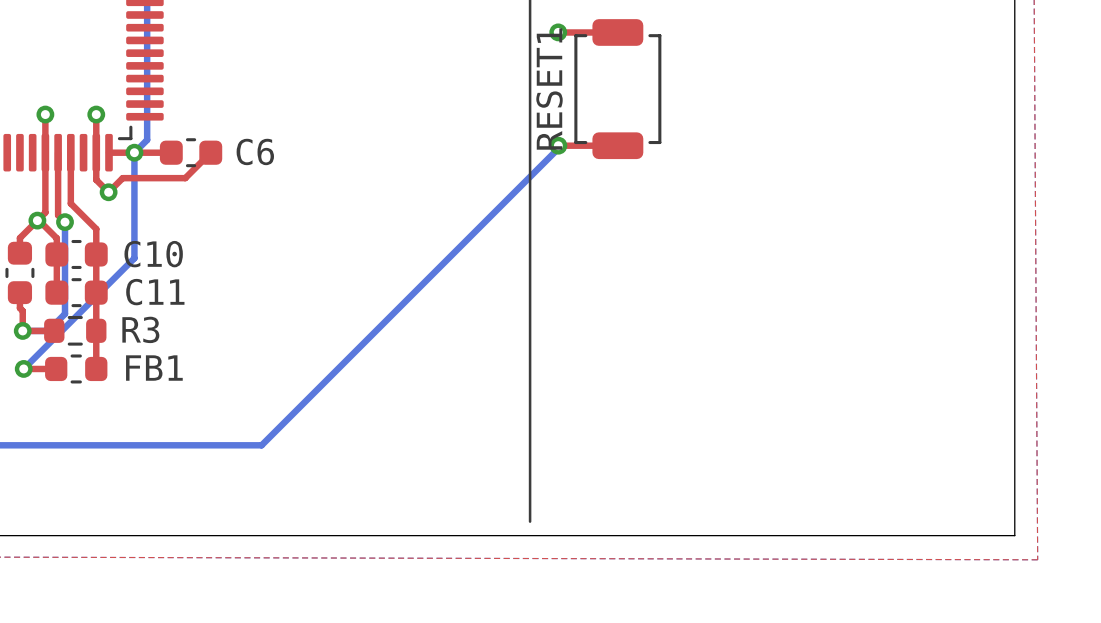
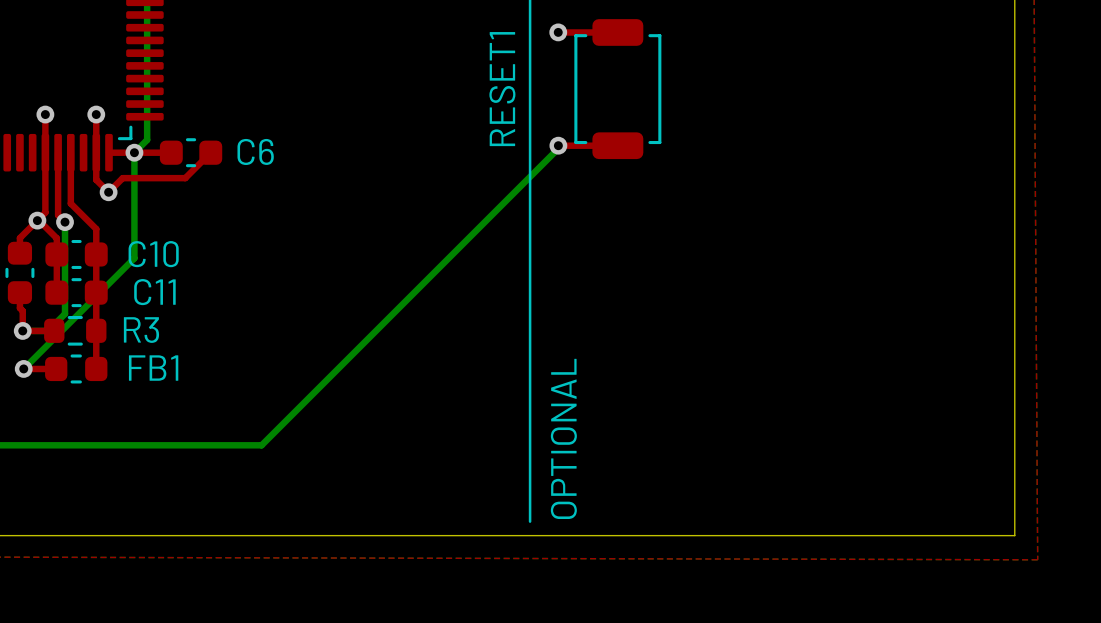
RESET1 name position: RESET1 (549, 89) -> RESET1 (502, 89)
text: none -> OPTIONAL (563, 438)

